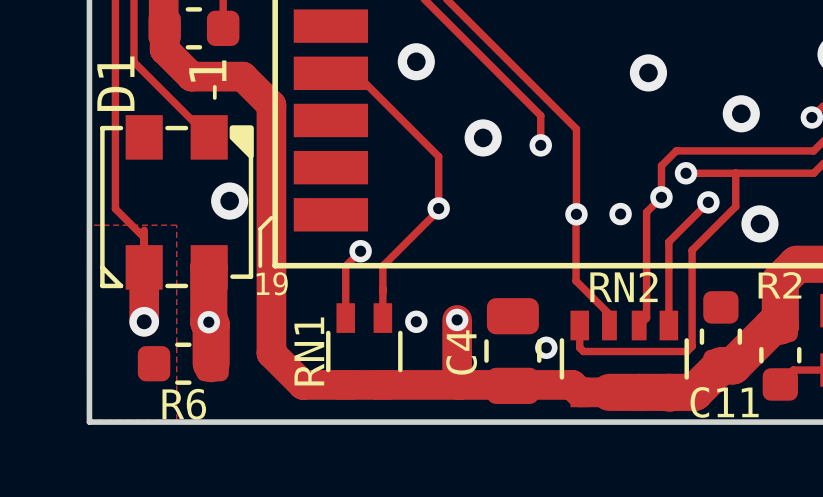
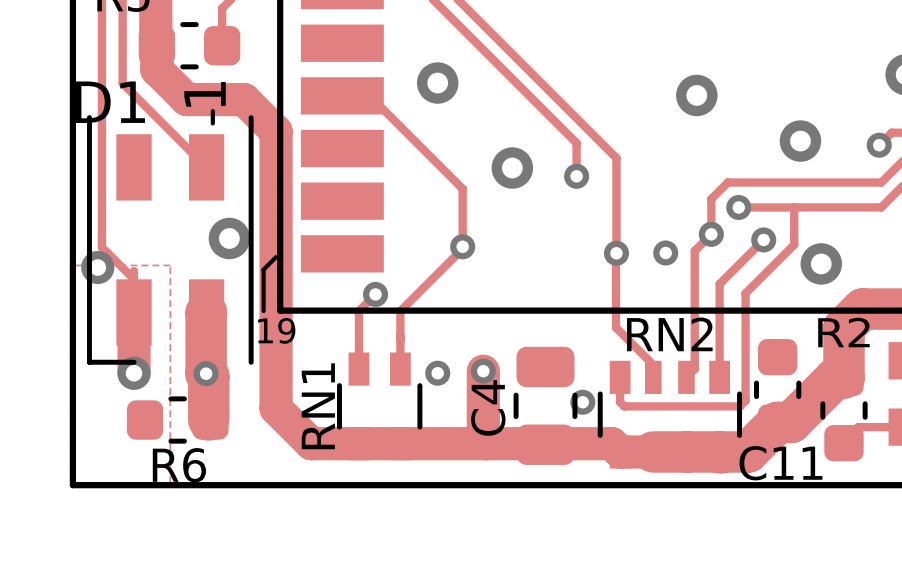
D1 footprint: [100, 115, 254, 290] -> [86, 115, 254, 365]
via: none -> (97, 267)

